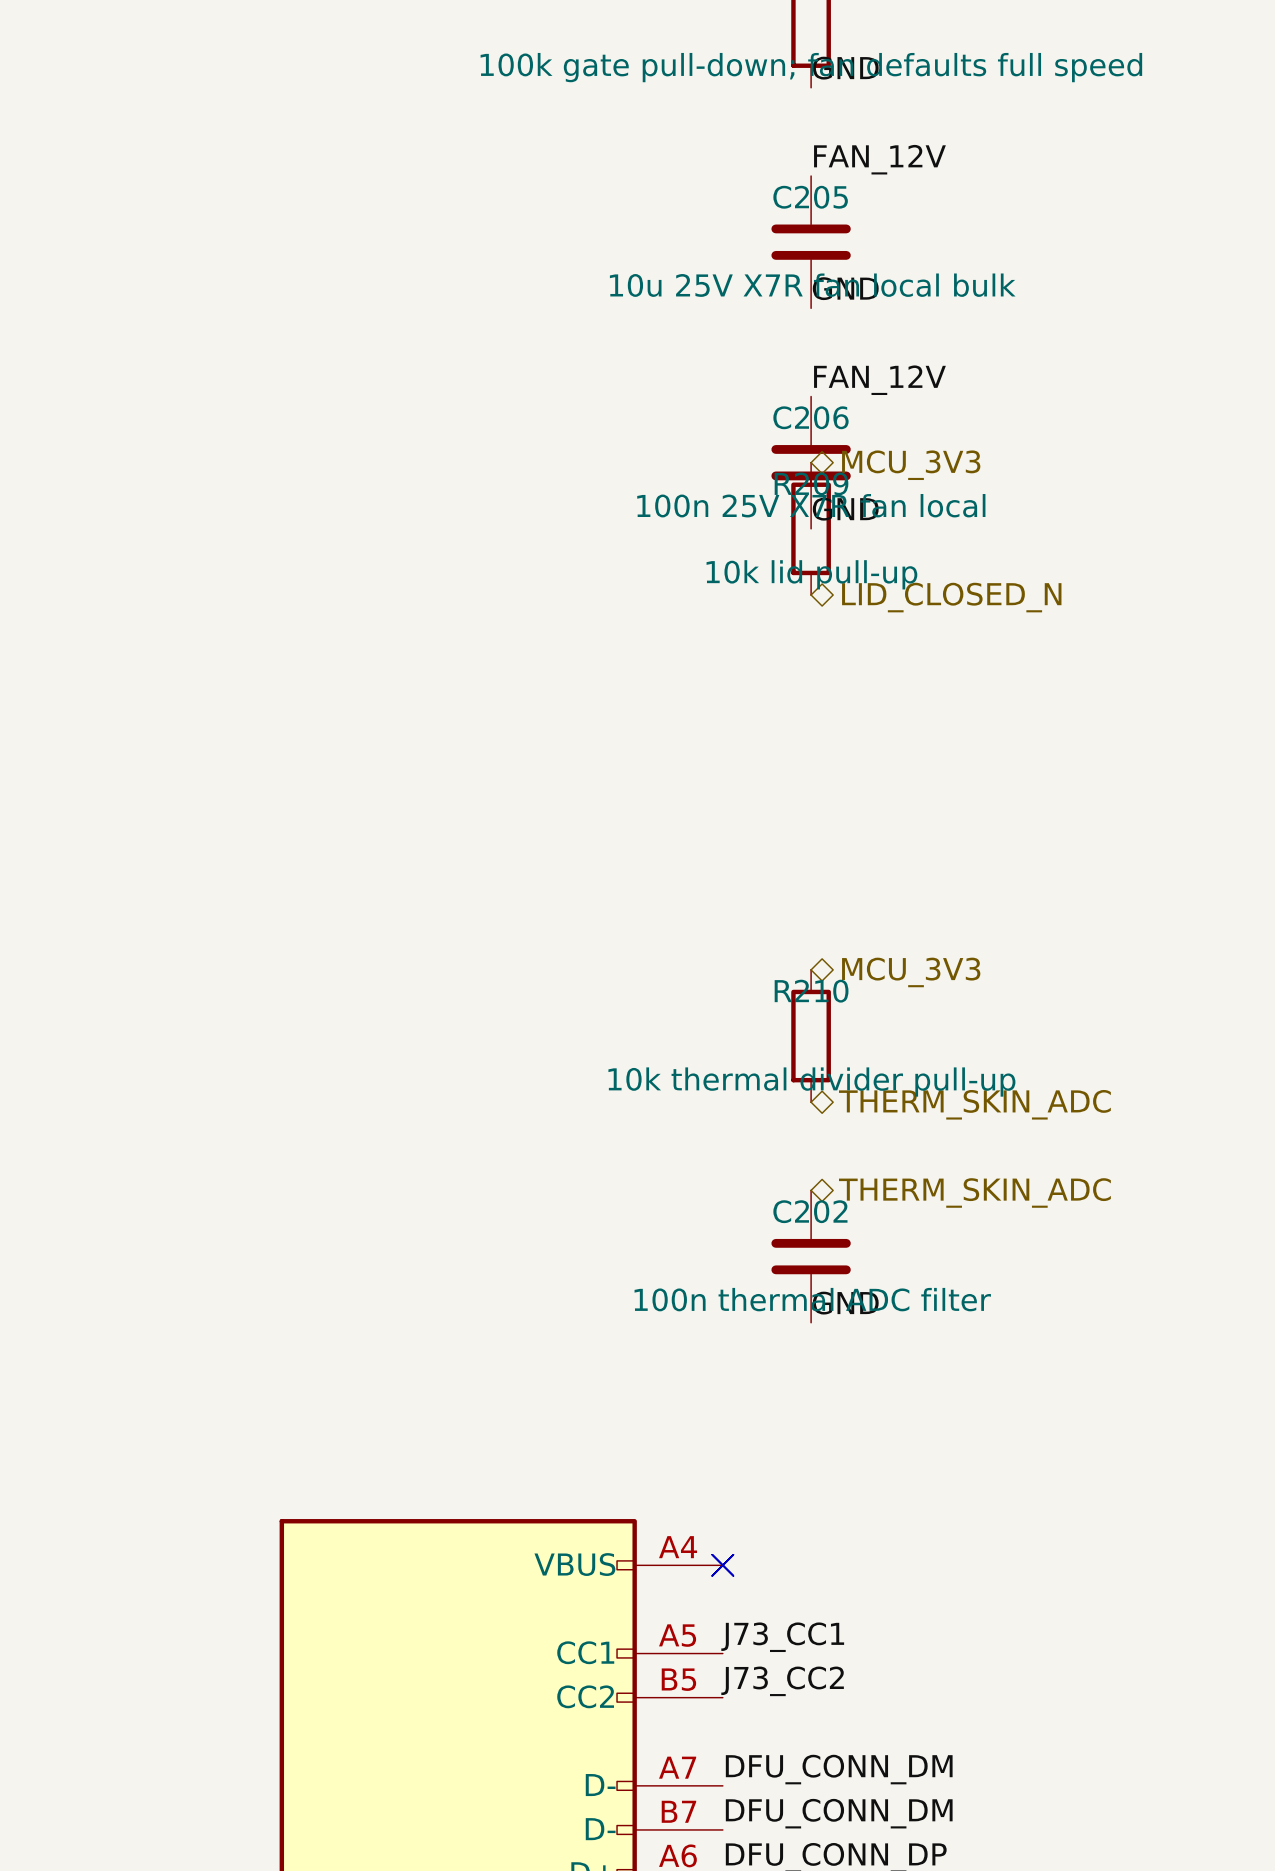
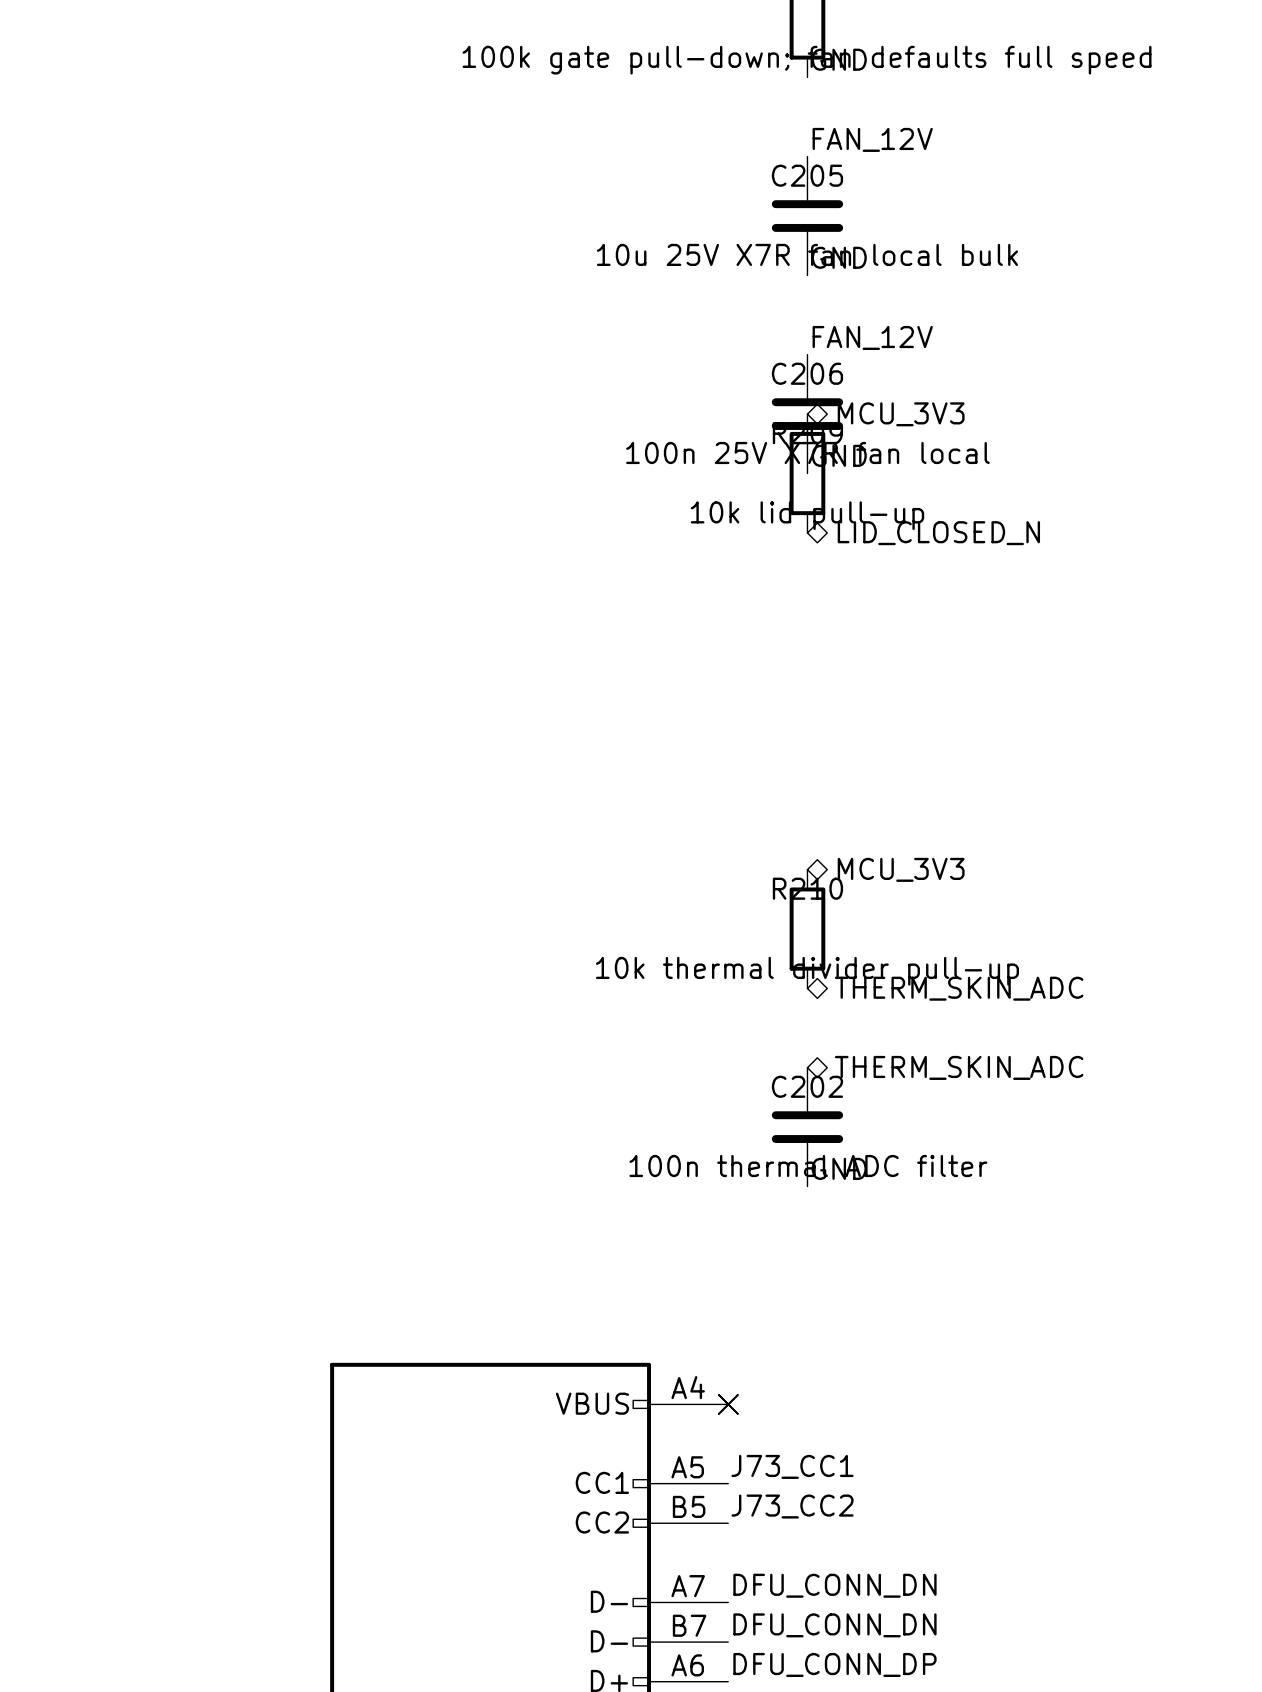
label: DFU_CONN_DM (839, 1769) -> DFU_CONN_DN (834, 1585)
label: DFU_CONN_DM (839, 1813) -> DFU_CONN_DN (834, 1625)

